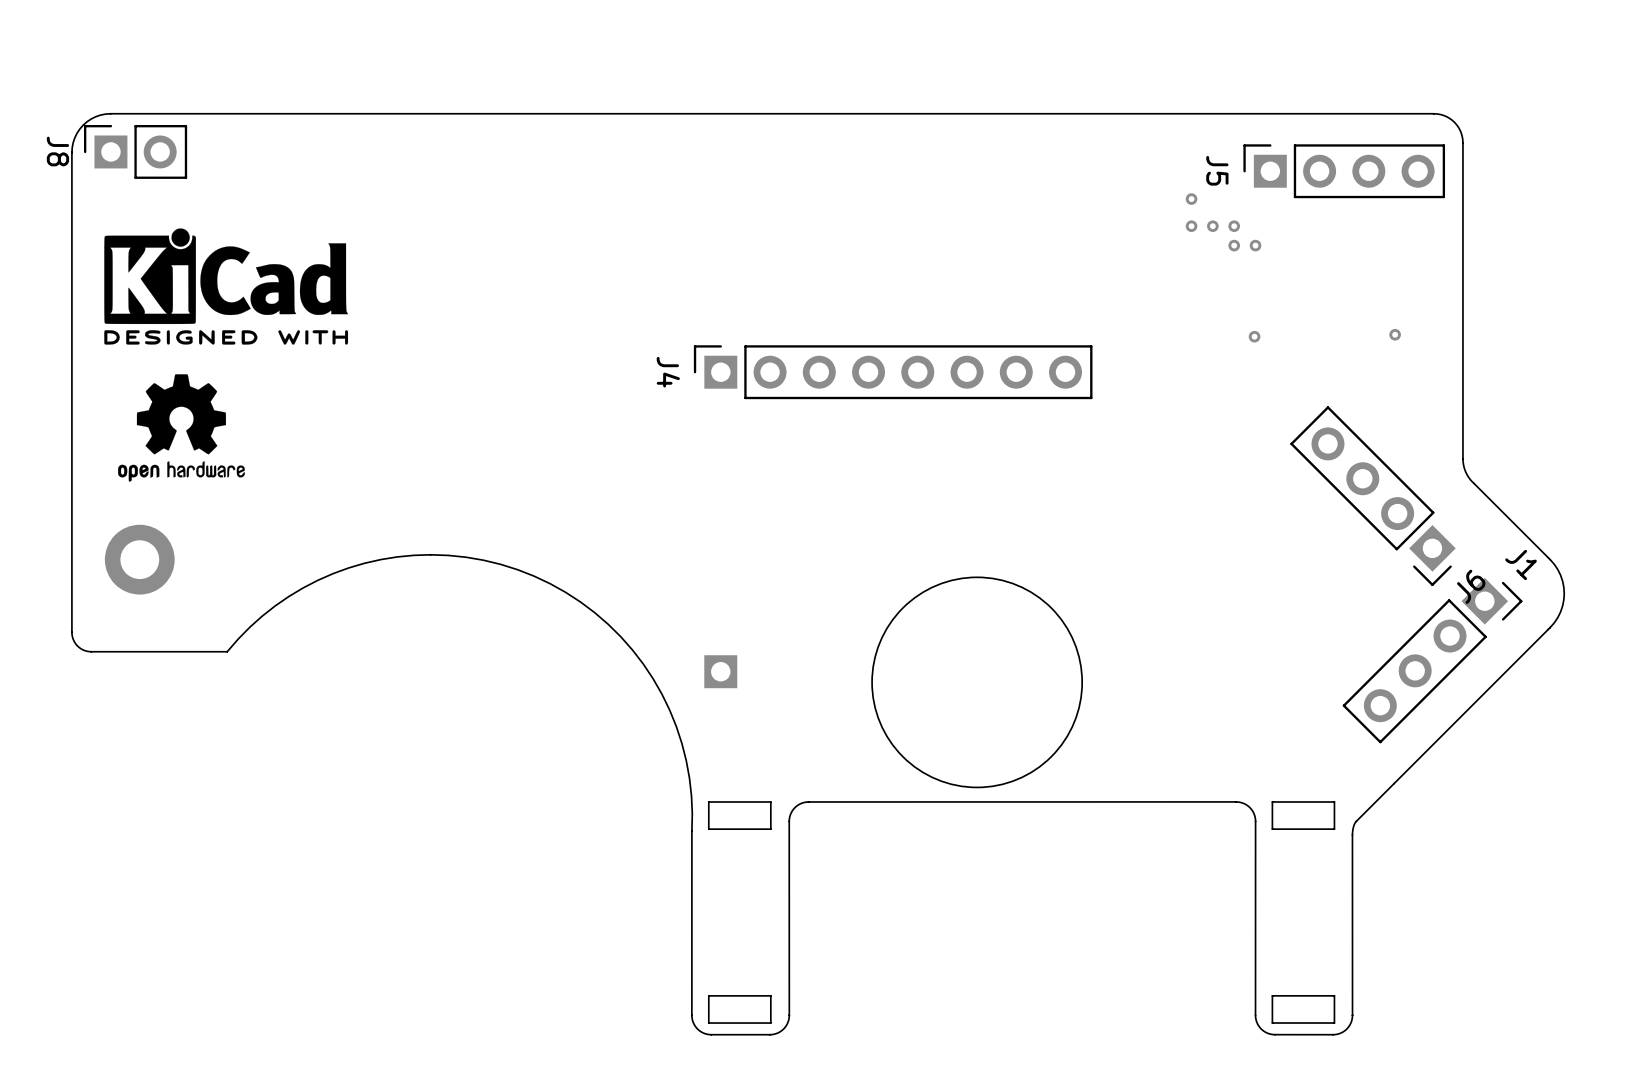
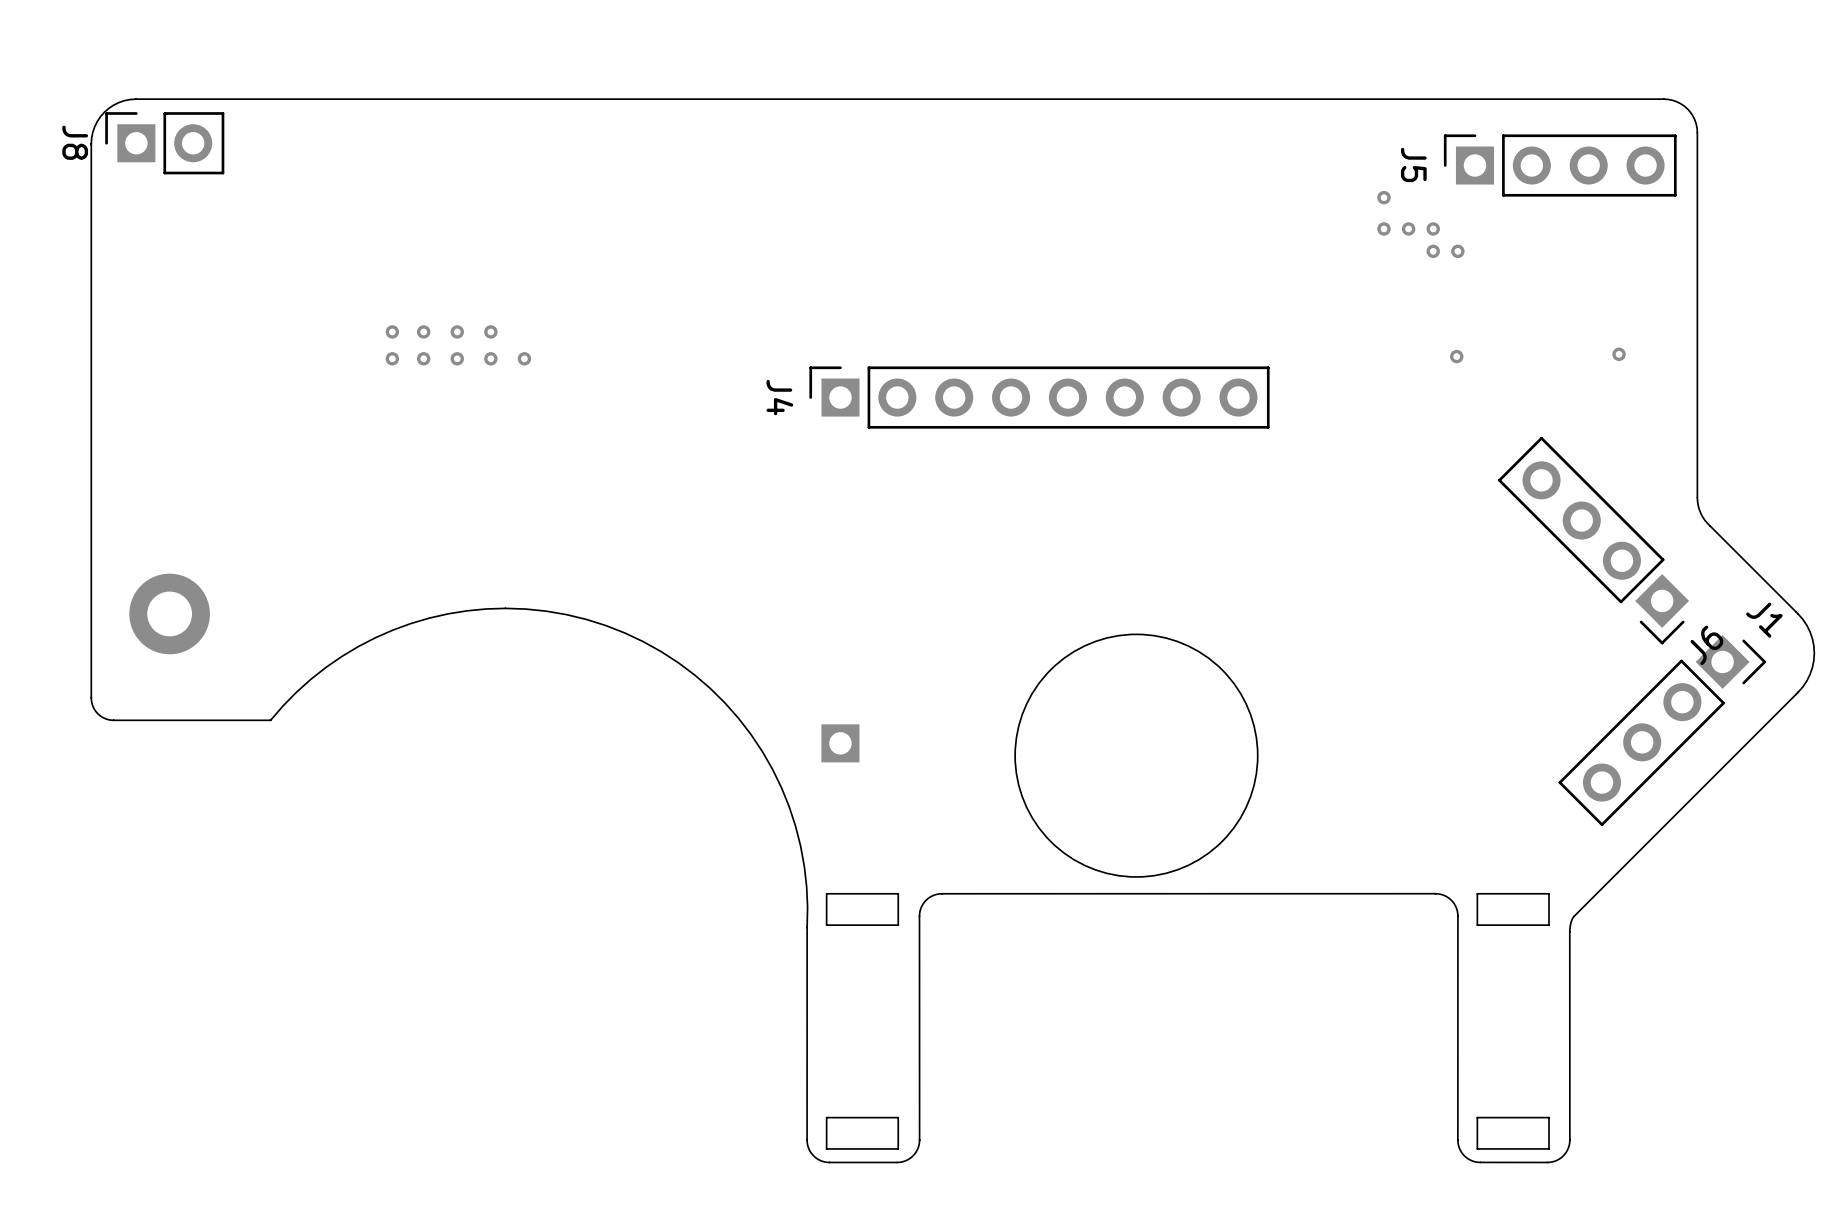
drawing: [104, 228, 349, 345] -> none
via: none -> (392, 331)
via: none -> (423, 331)
via: none -> (457, 331)
via: none -> (490, 331)
via: none -> (392, 358)
via: none -> (423, 358)
via: none -> (457, 358)
via: none -> (490, 358)
via: none -> (524, 358)
drawing: [118, 374, 245, 482] -> none

